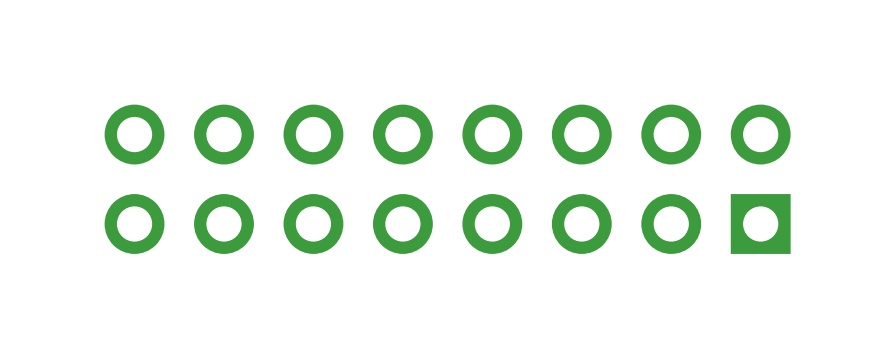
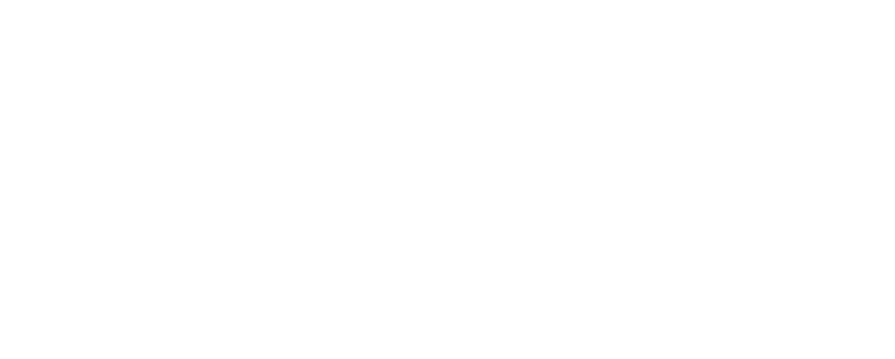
part: (447, 179) -> none

